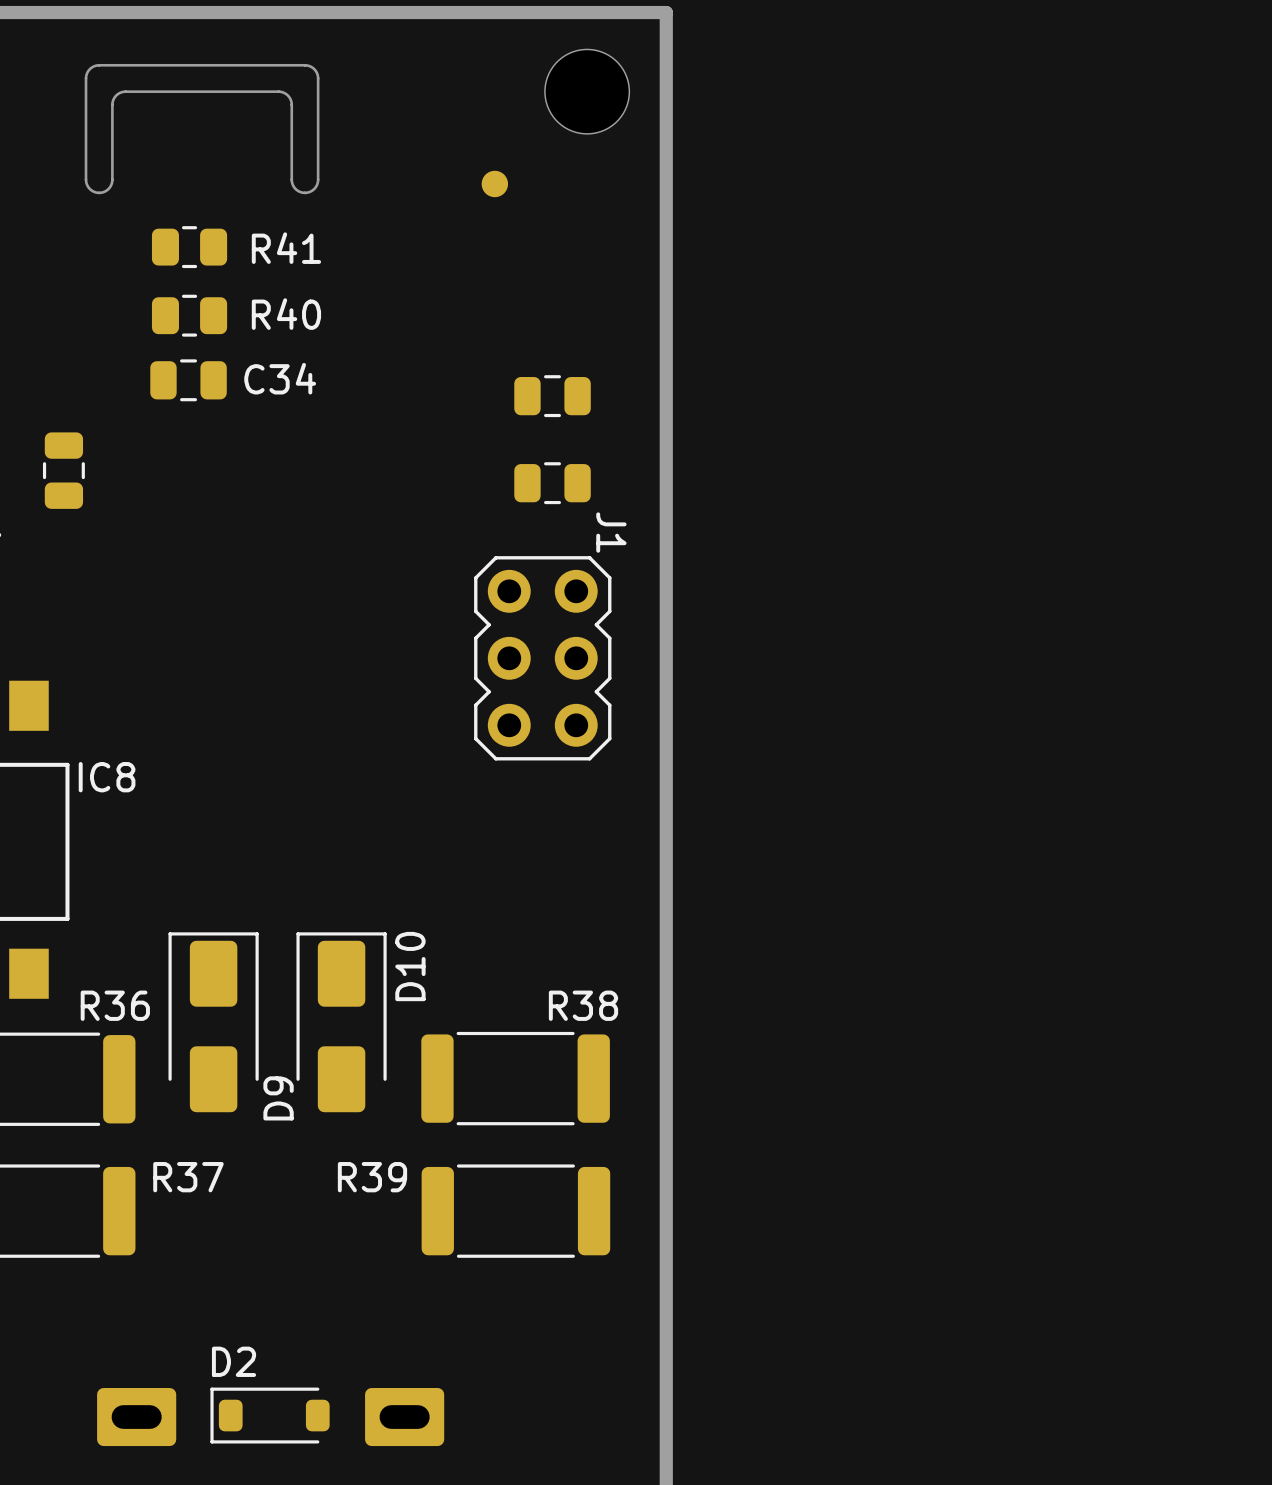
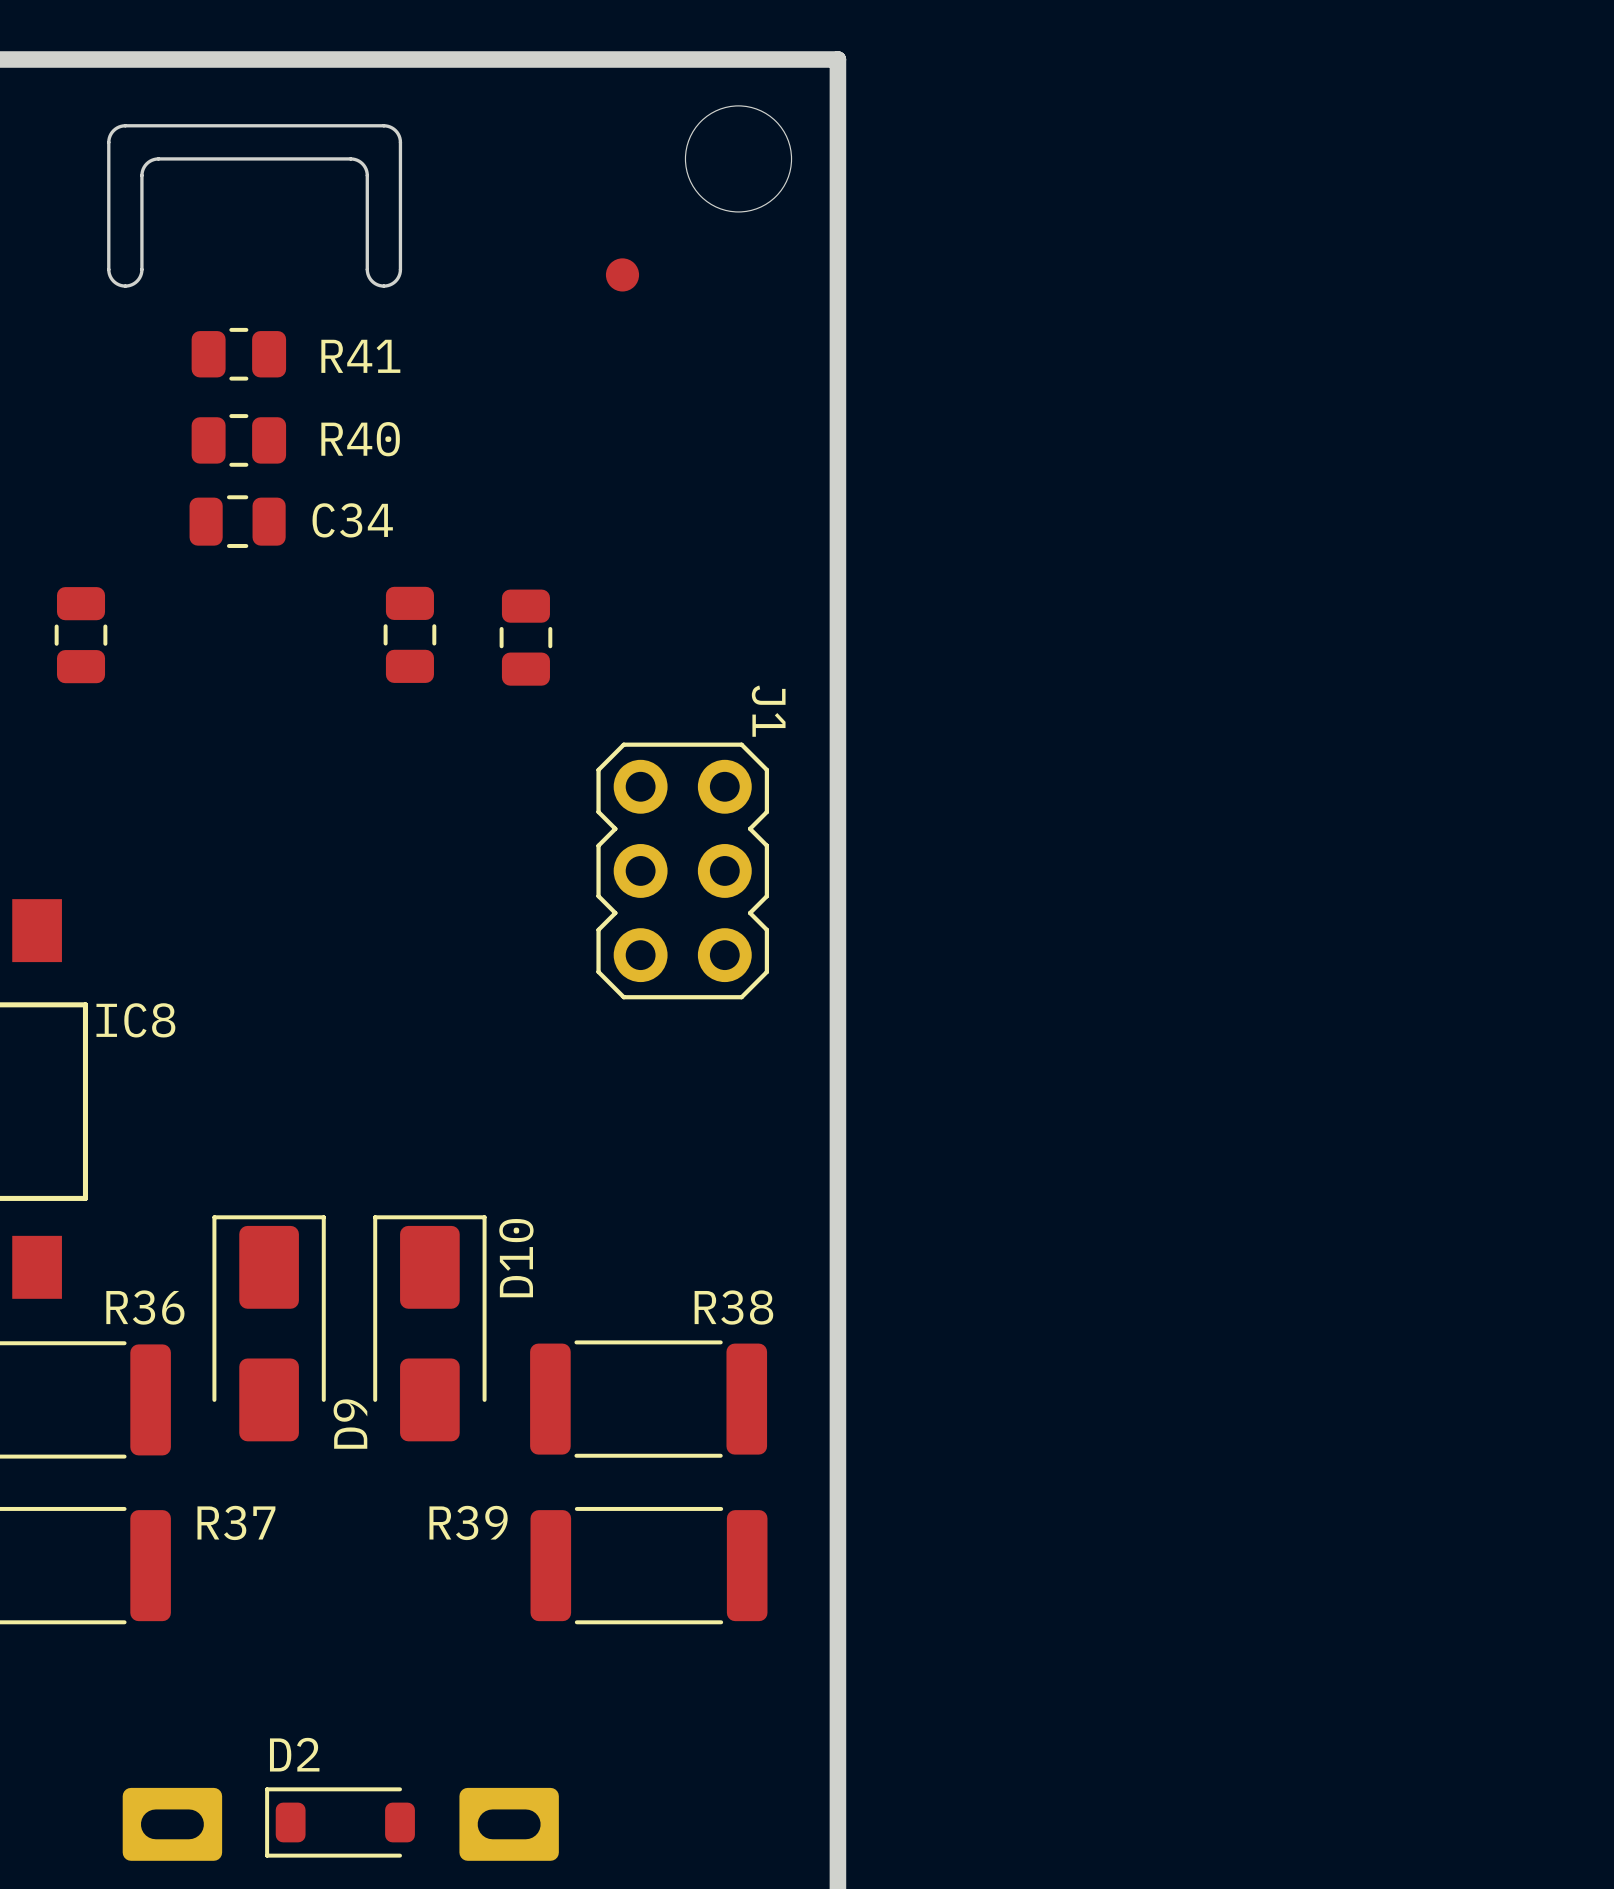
part: (552, 396) -> none
part: none -> (409, 634)
part: none -> (525, 637)
part: (552, 483) -> none

